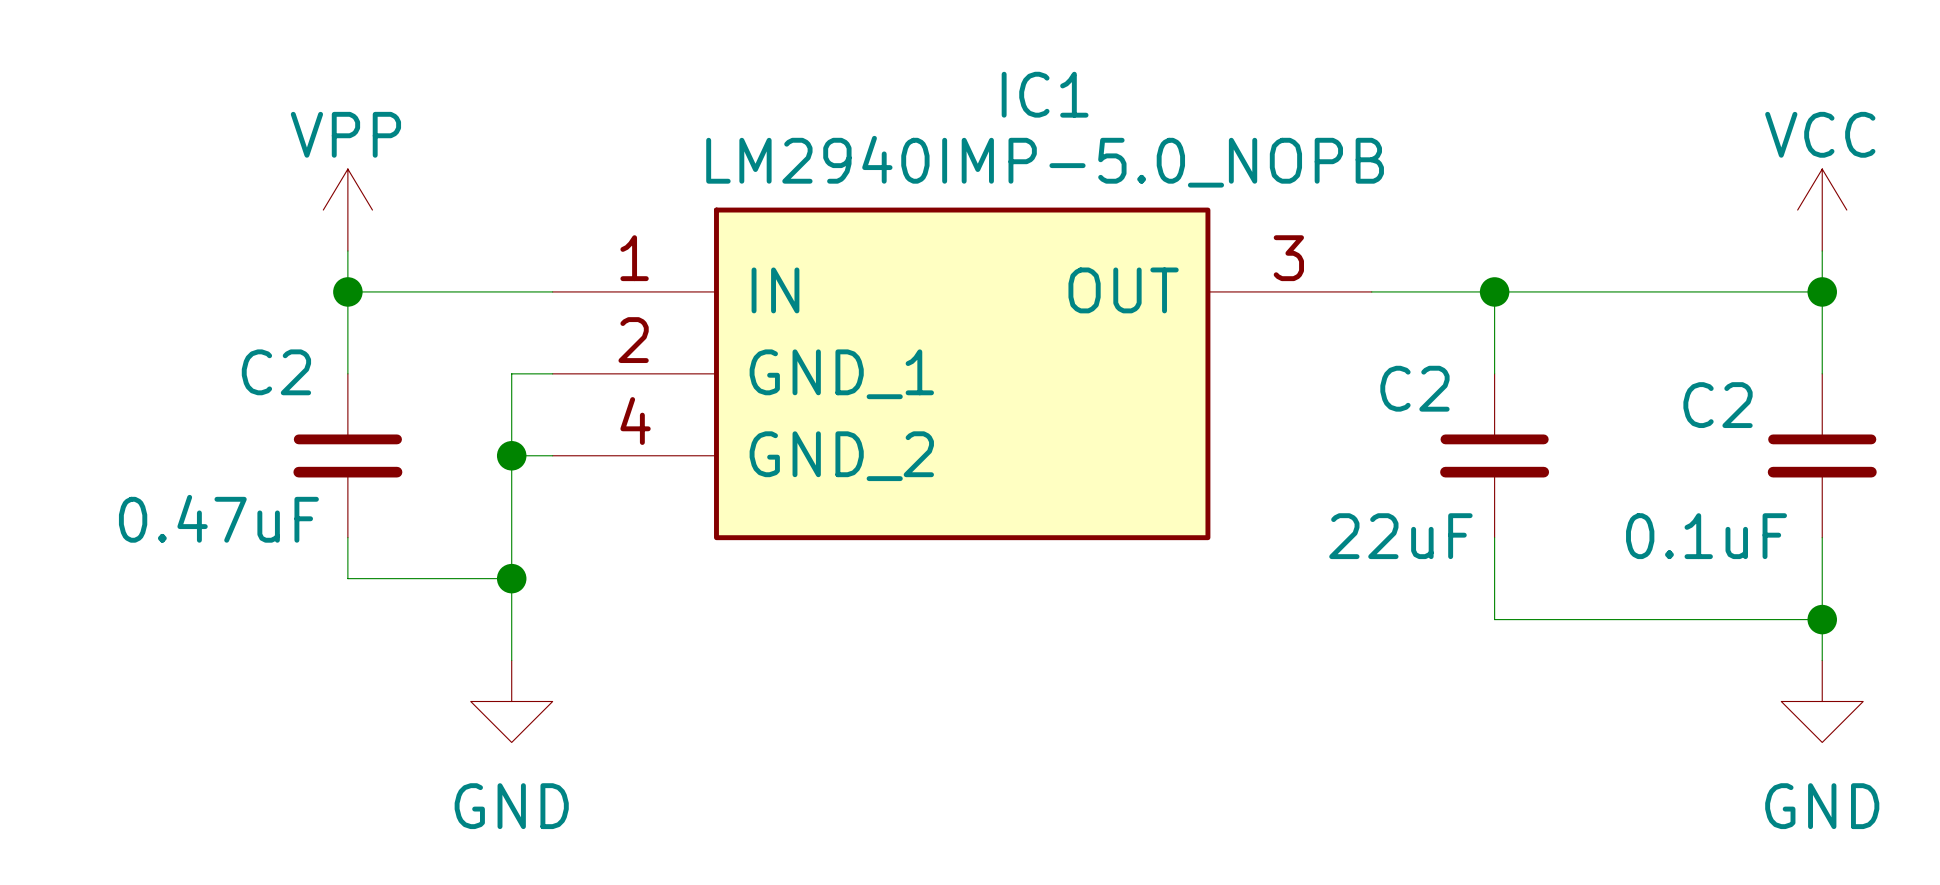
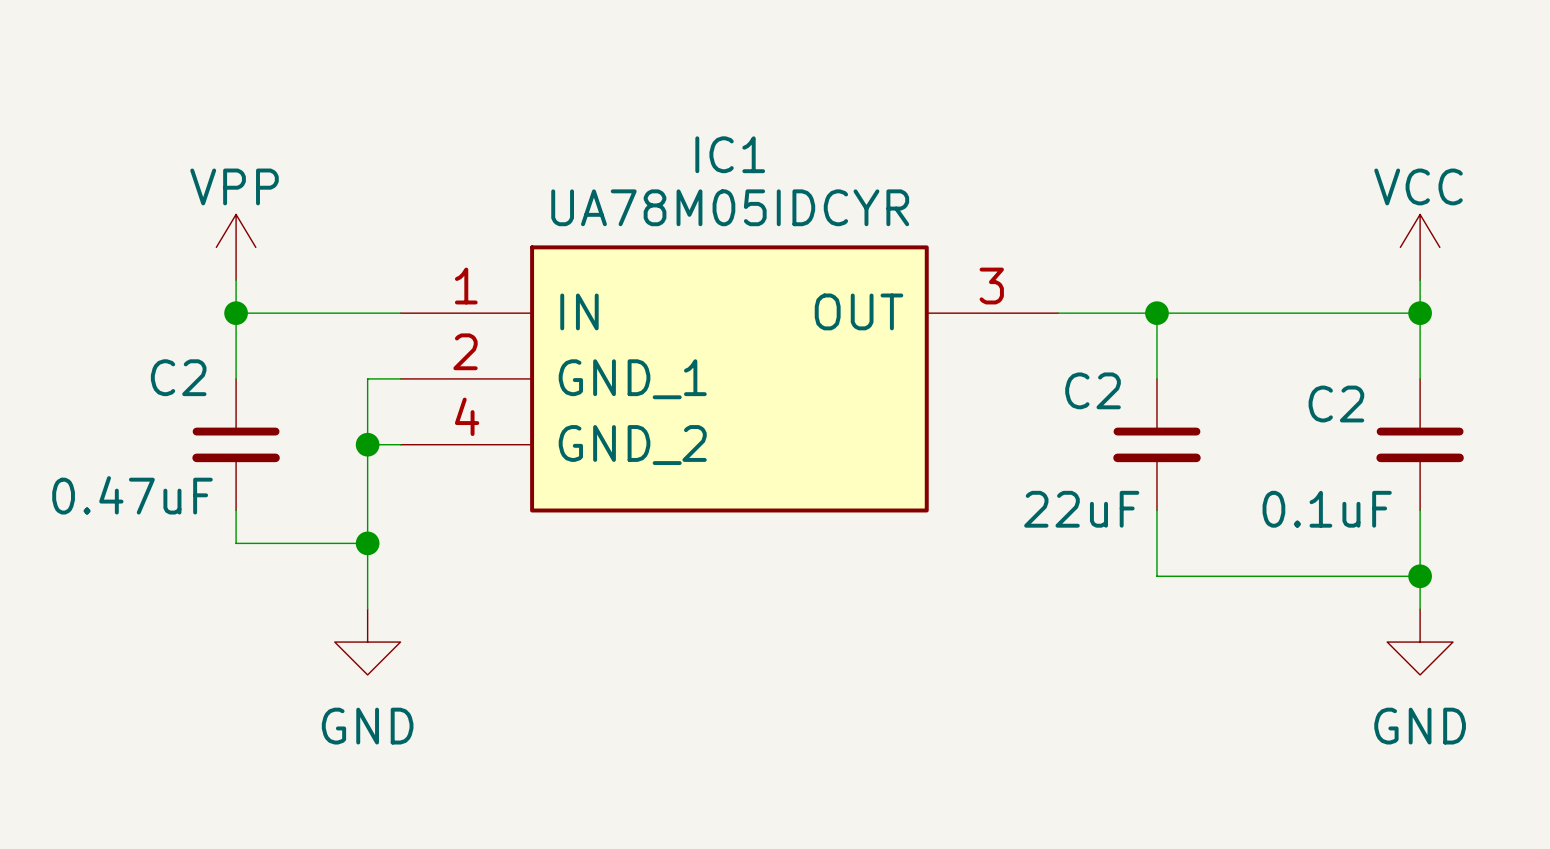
IC1 name position: IC1 (1045, 94) -> IC1 (730, 154)
IC1 value: LM2940IMP-5.0_NOPB (1045, 161) -> UA78M05IDCYR (730, 207)

